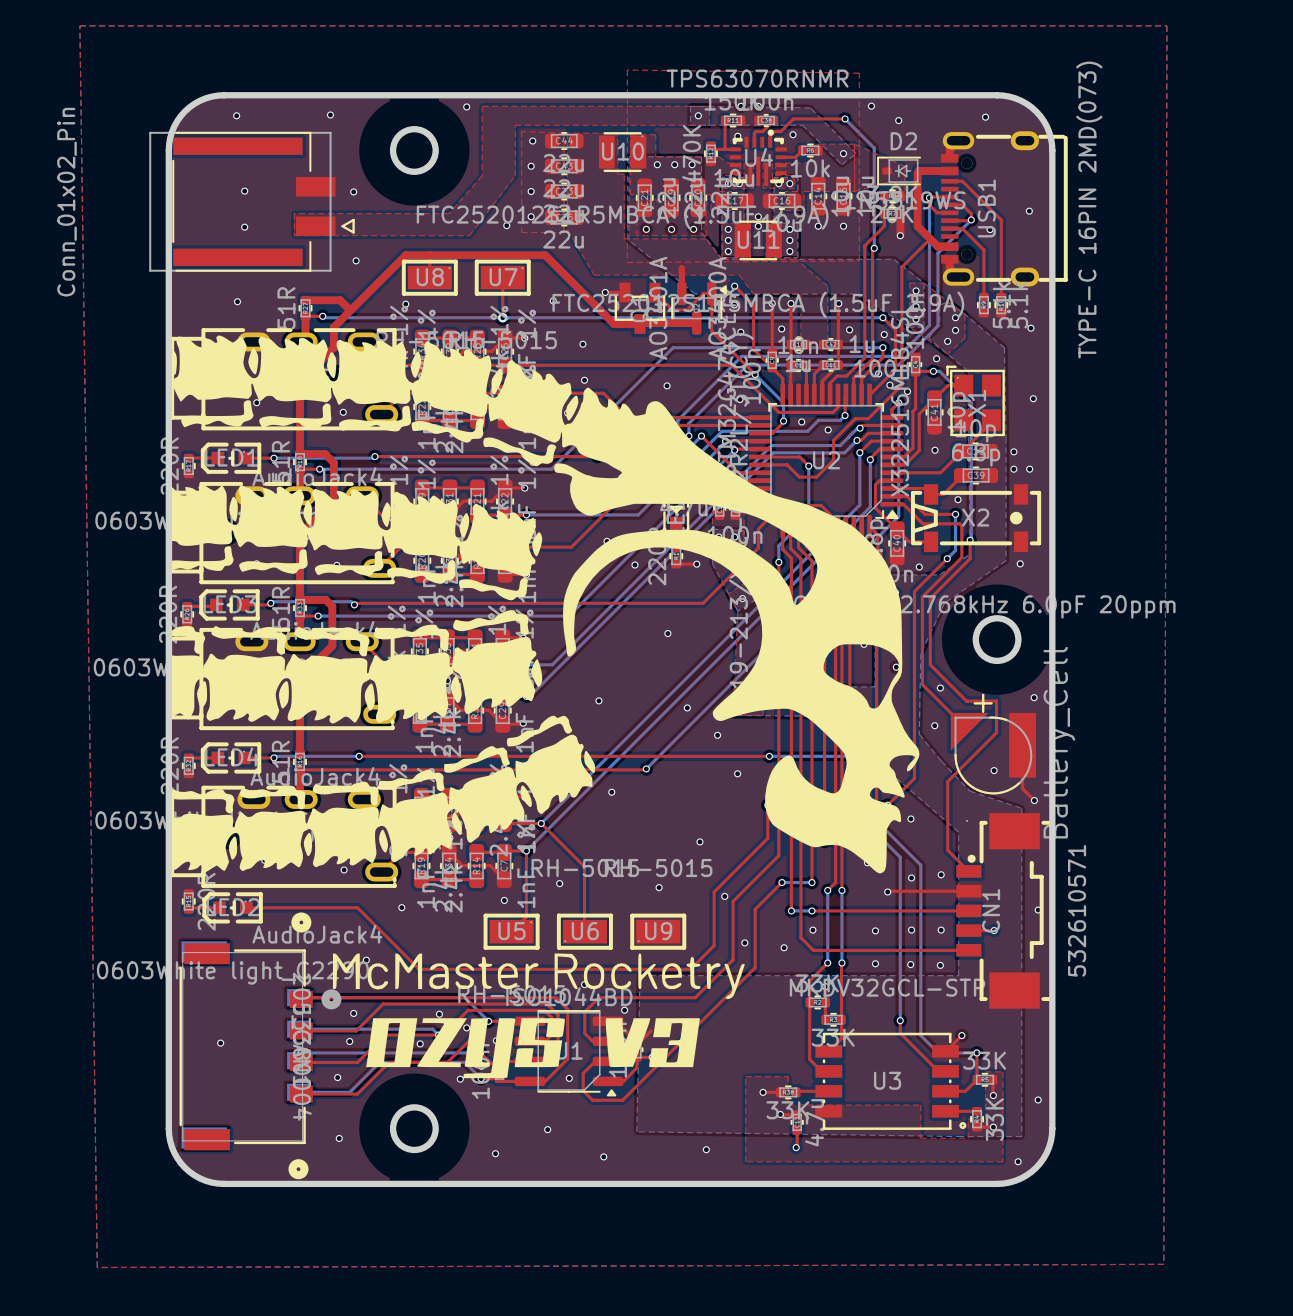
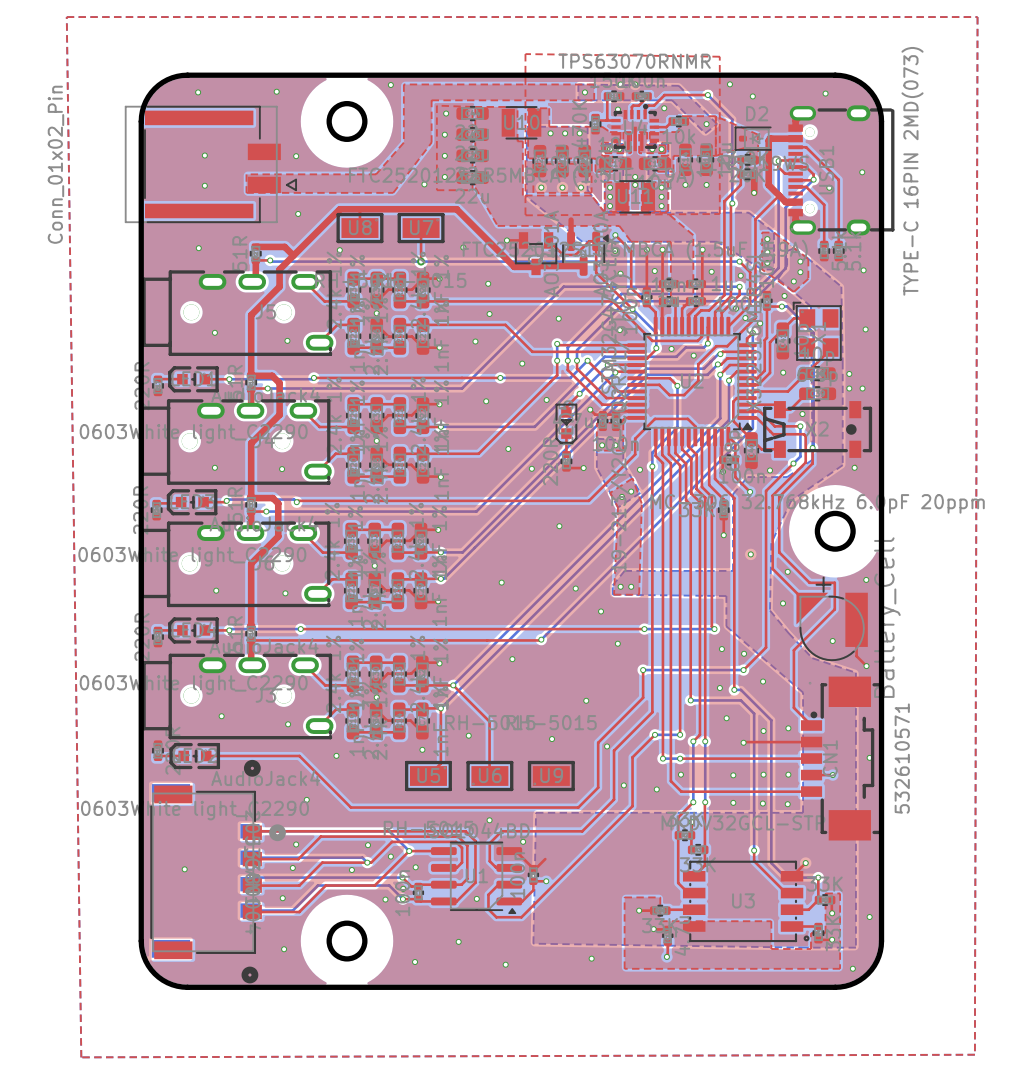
drawing: [170, 335, 920, 874] -> none
drawing: [332, 953, 745, 1079] -> none

